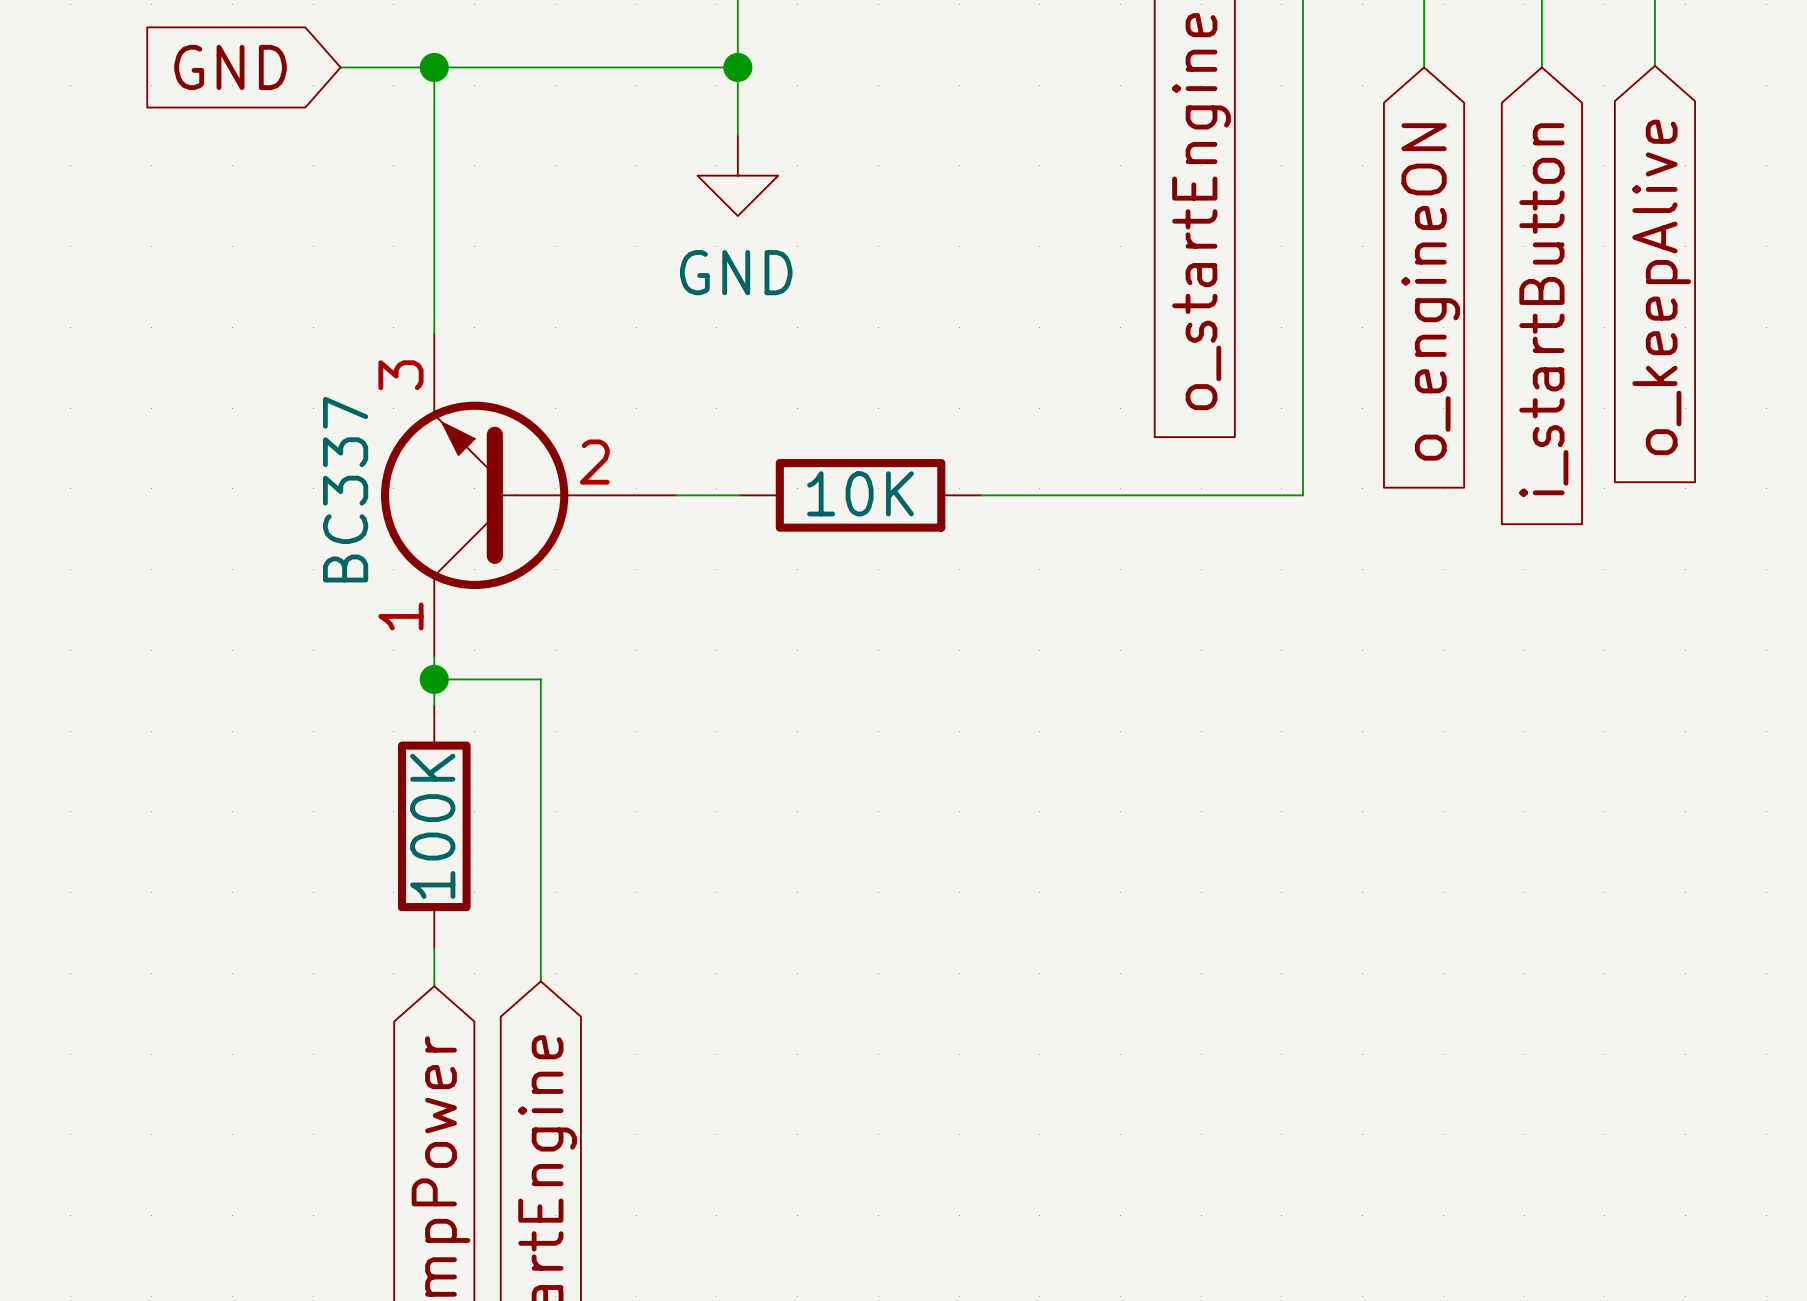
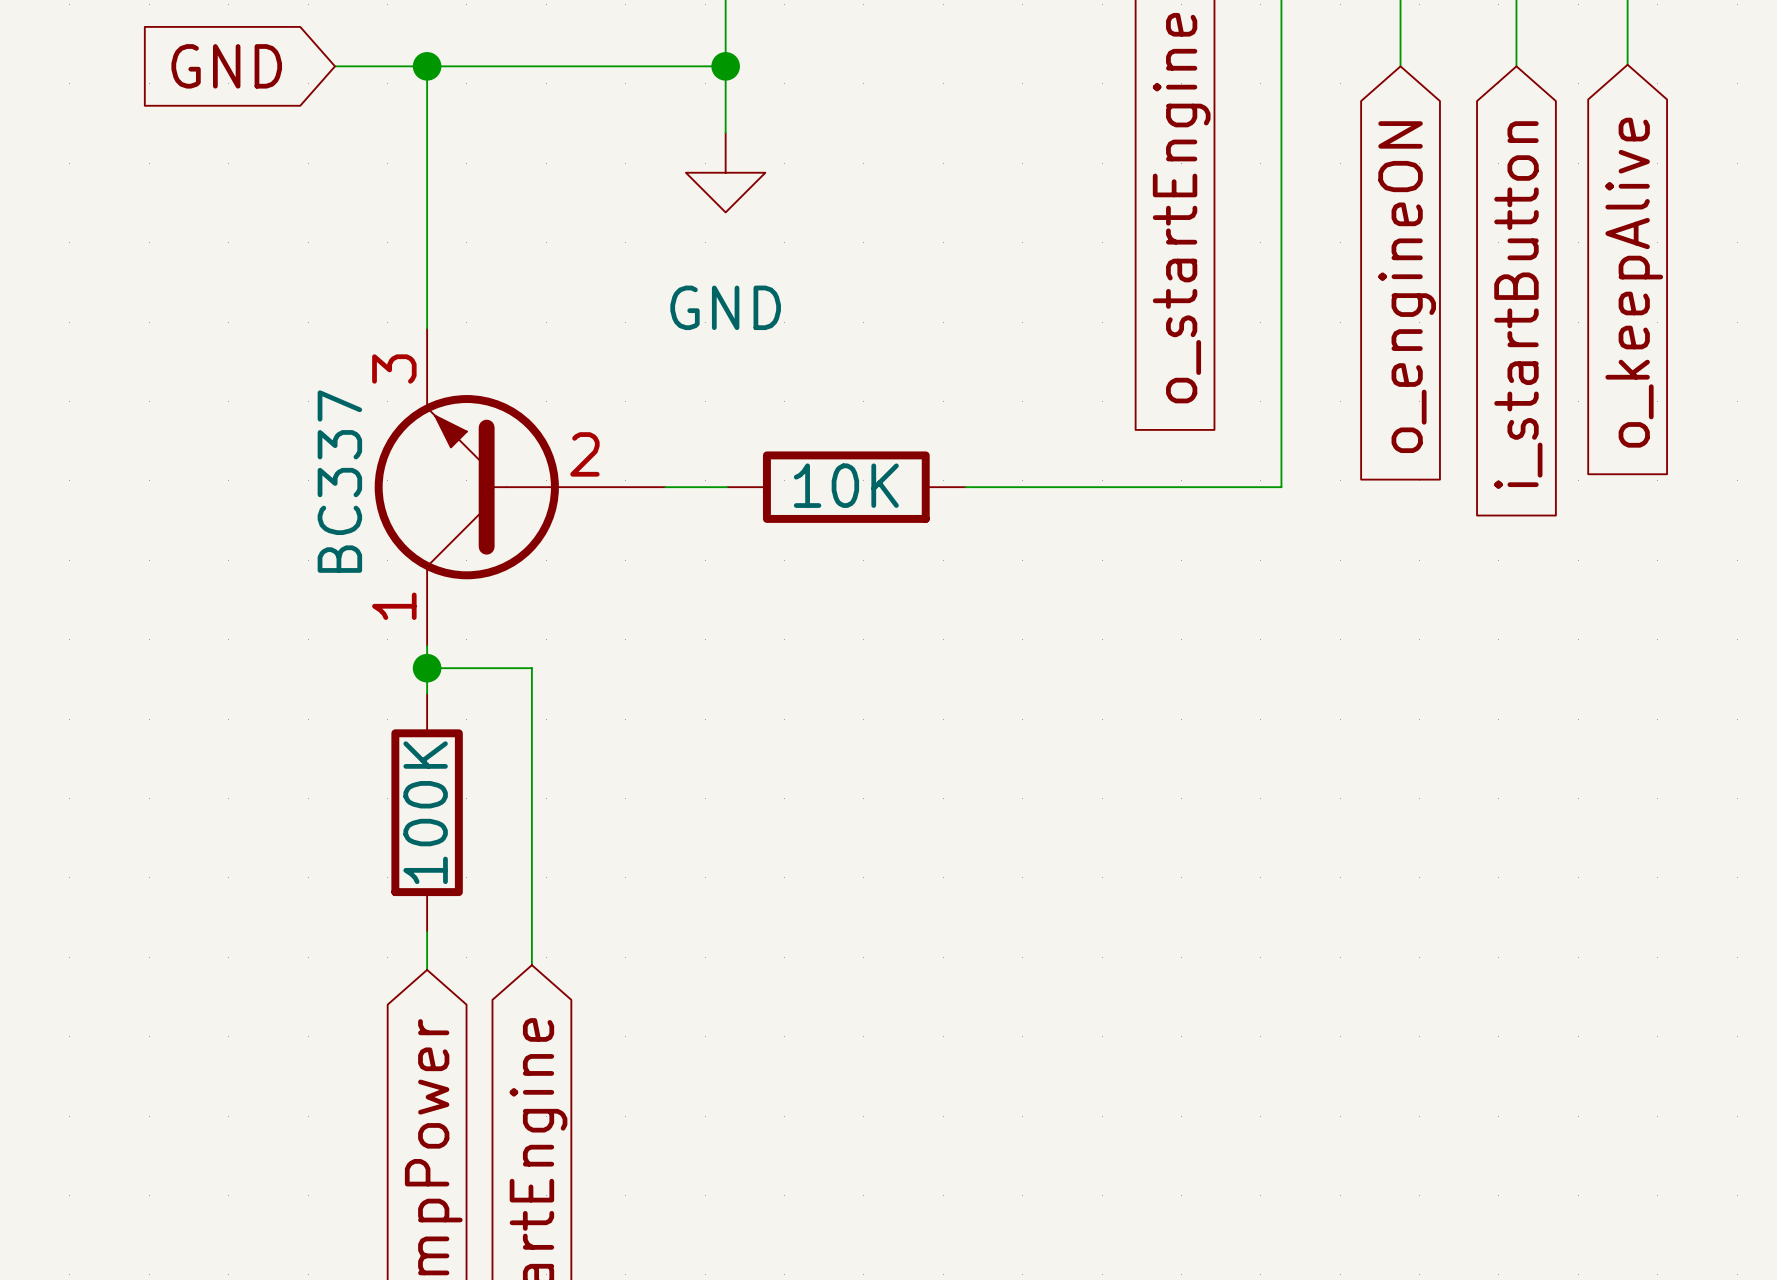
power symbol text position: GND (736, 272) -> GND (725, 307)

